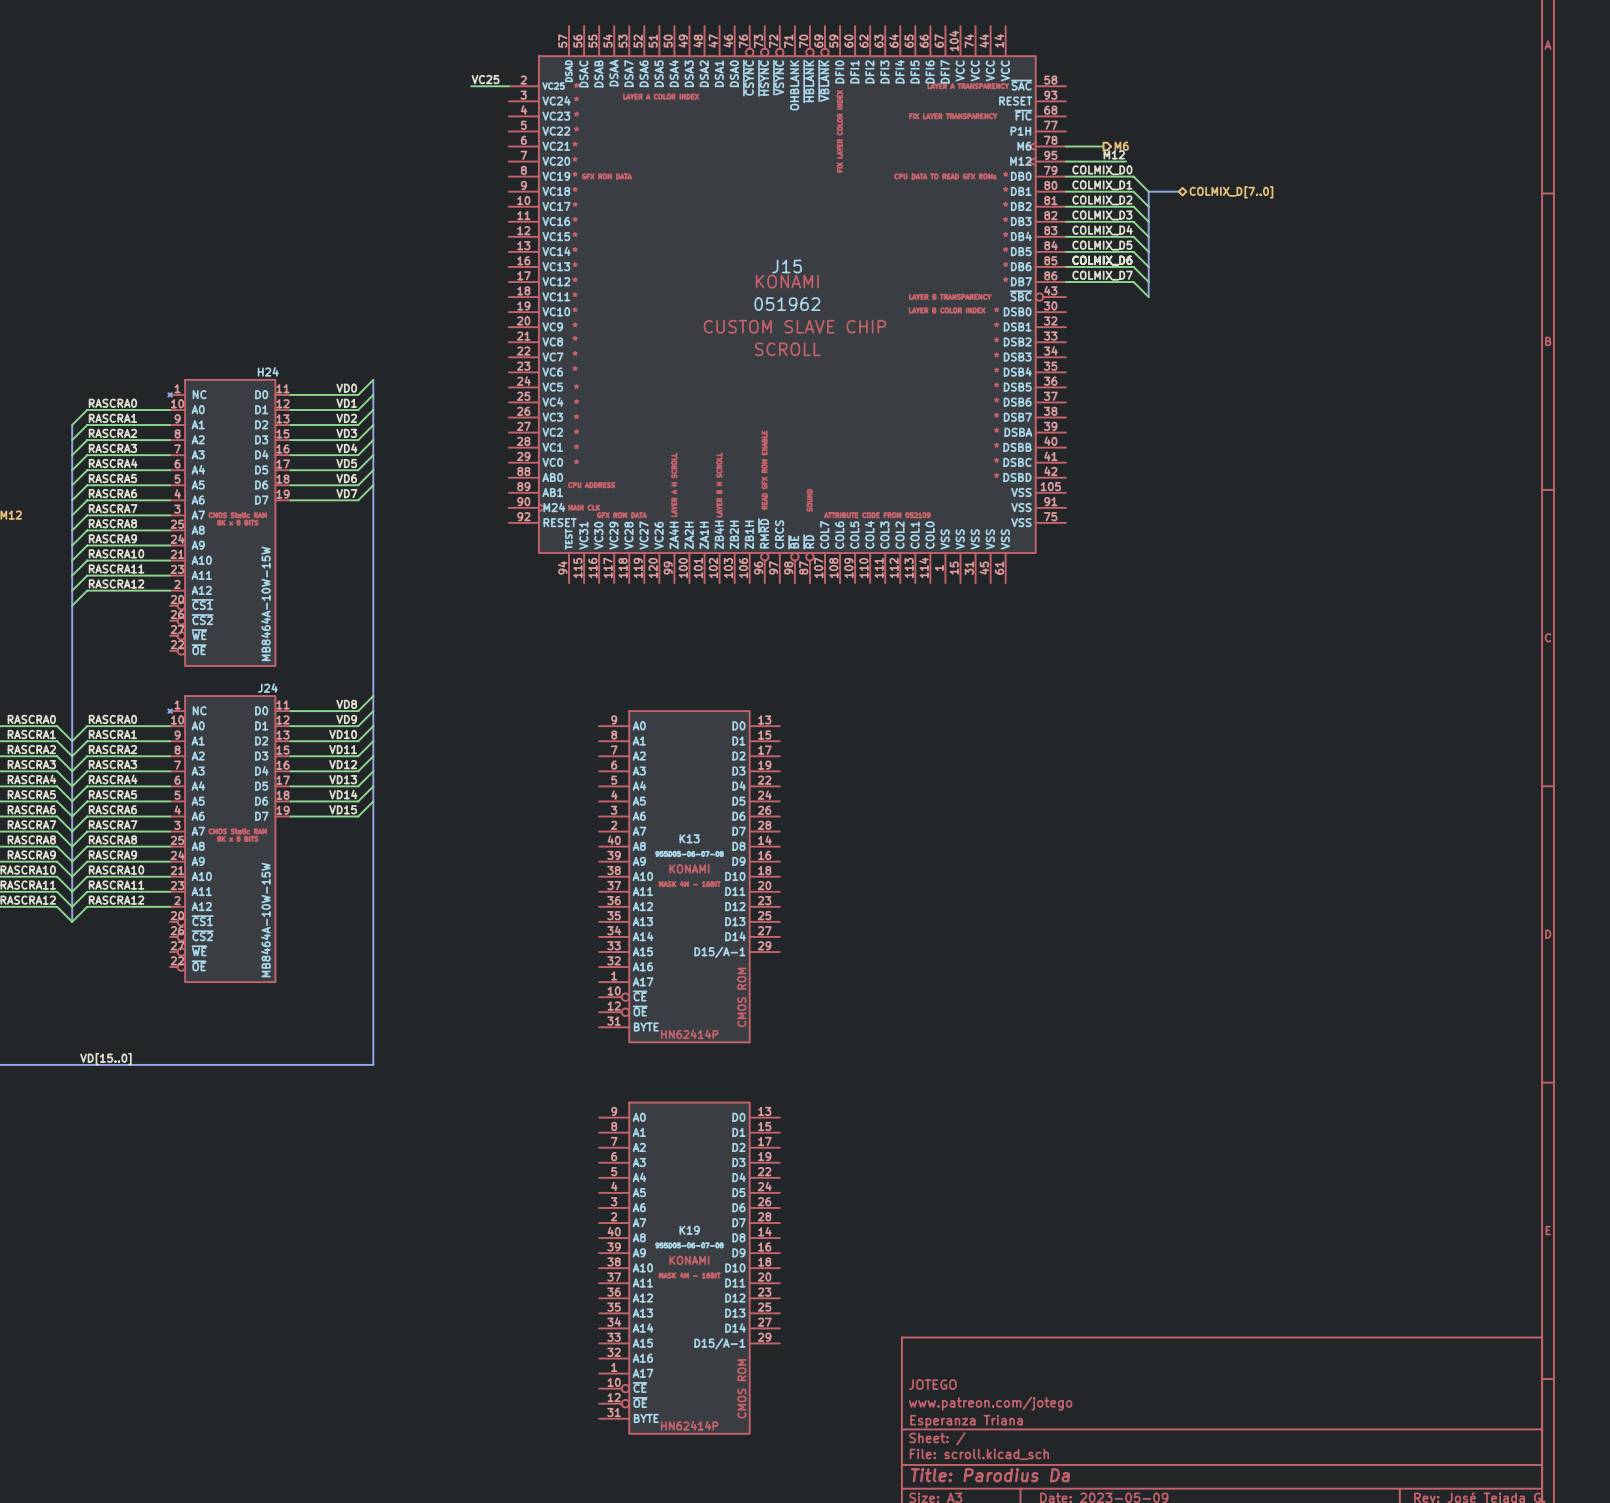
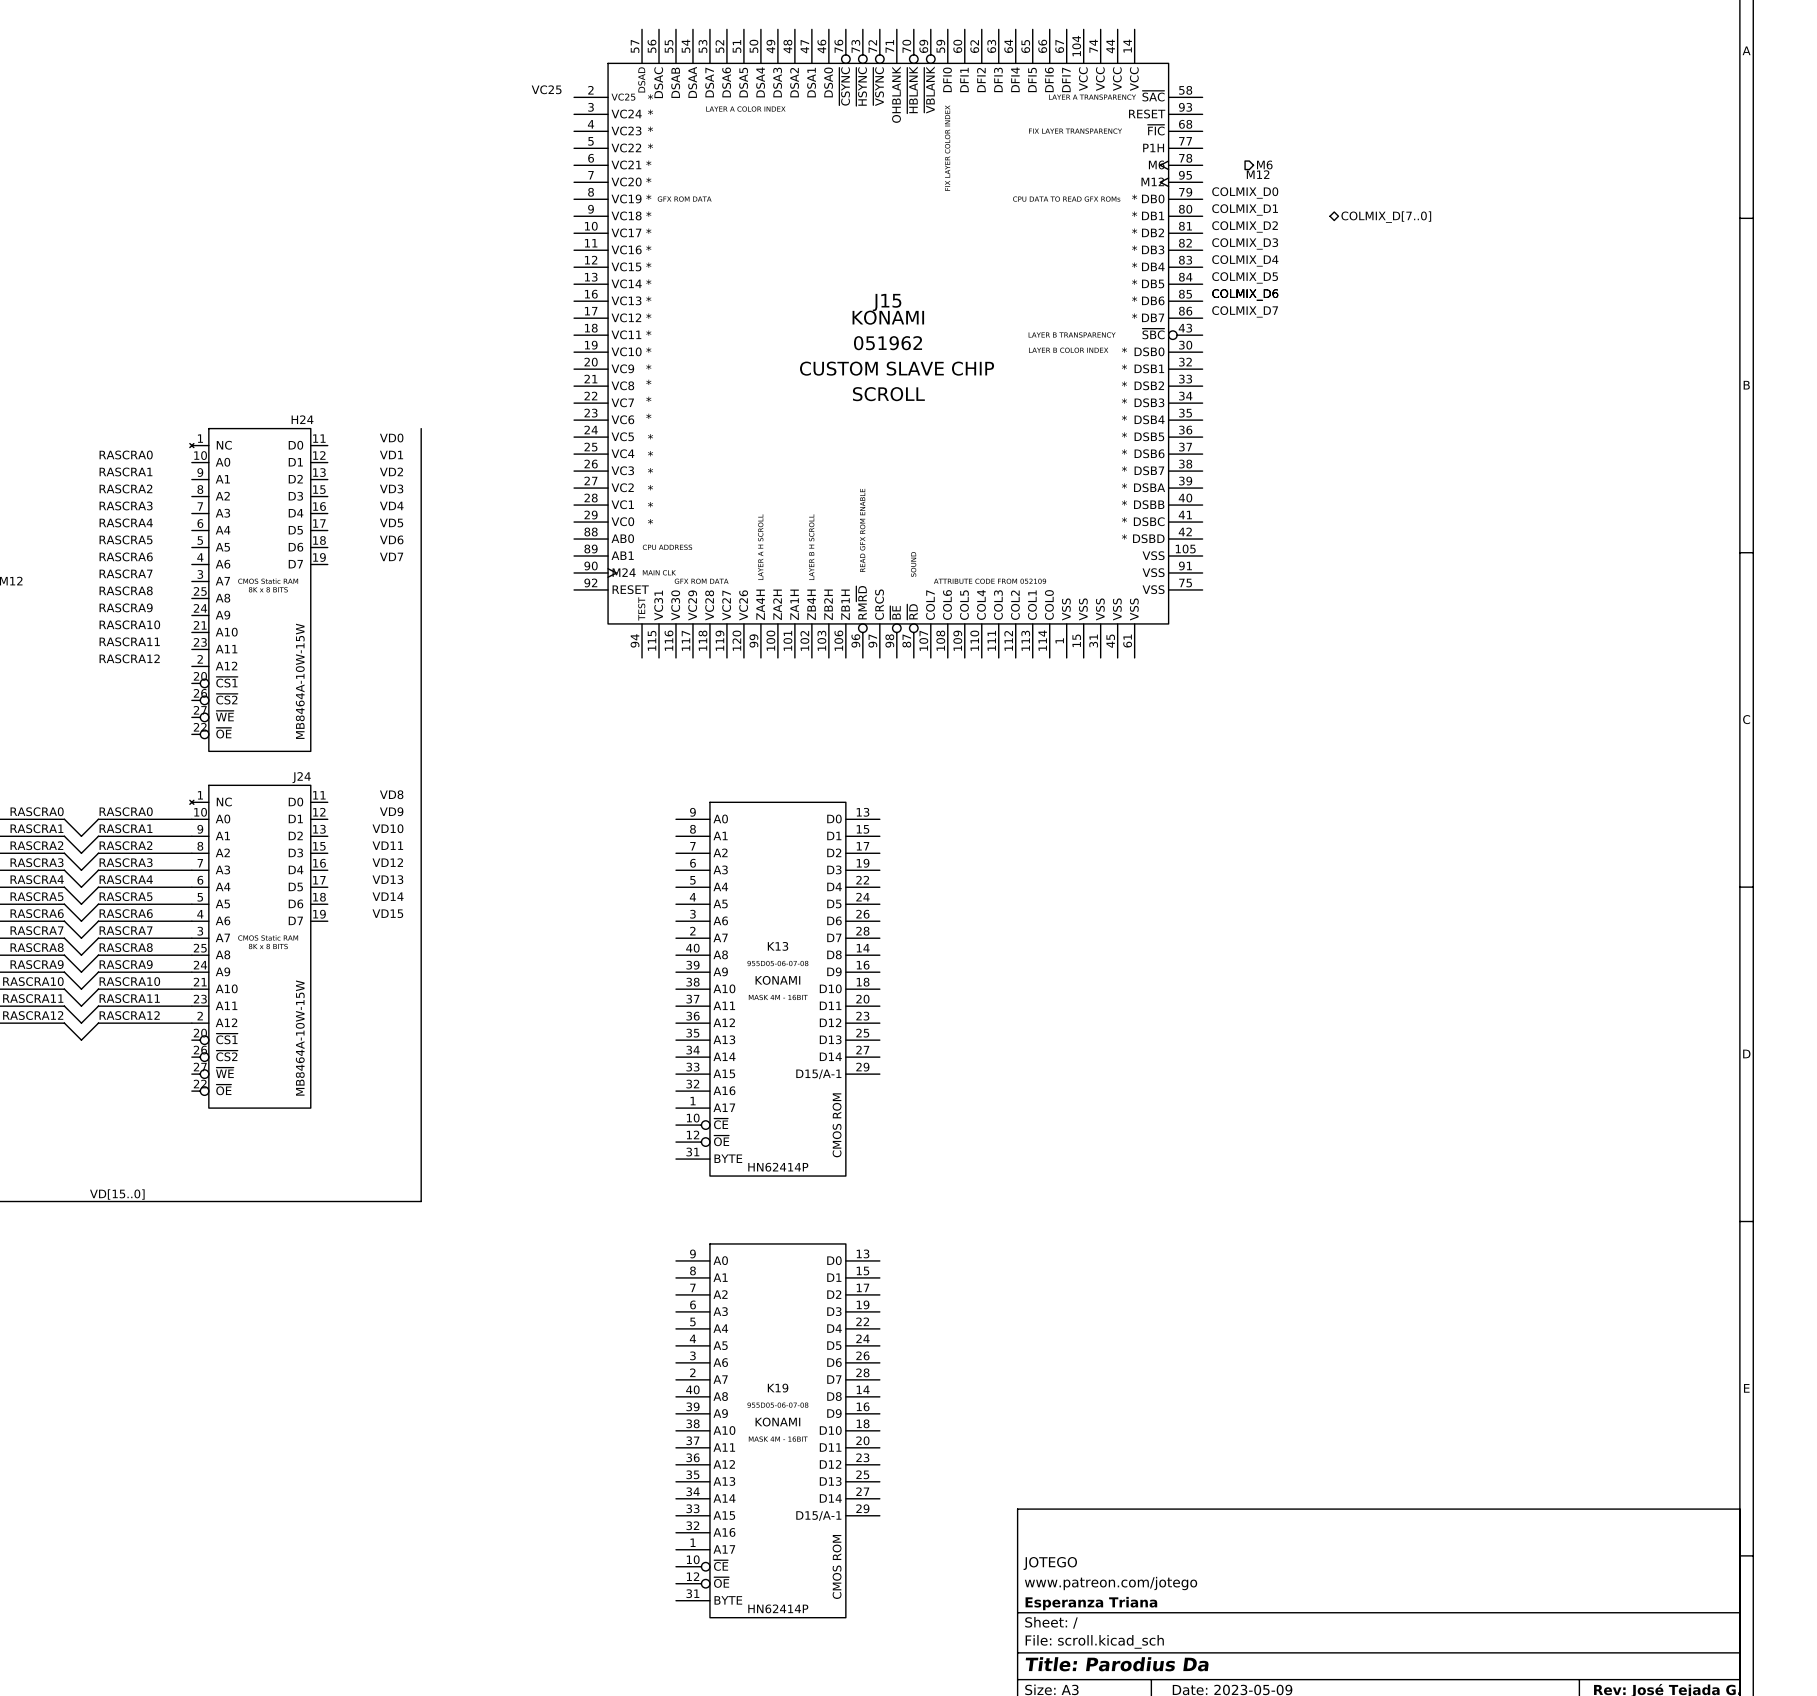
wire: (471, 86) (508, 86) -> none
wire: (1065, 146) (1103, 146) -> none
wire: (1065, 161) (1126, 161) -> none
wire: (1065, 176) (1133, 176) (1148, 191) -> none
wire: (1065, 191) (1133, 191) (1148, 206) -> none
bus: (1178, 191) (1148, 191) (1148, 297) -> none
wire: (1065, 206) (1133, 206) (1148, 221) -> none
wire: (1065, 221) (1133, 221) (1148, 236) -> none
wire: (1065, 236) (1133, 236) (1148, 251) -> none
wire: (1065, 251) (1133, 251) (1148, 266) -> none
wire: (1065, 266) (1133, 266) (1148, 282) -> none
wire: (1065, 282) (1133, 282) (1148, 297) -> none
wire: (373, 379) (358, 394) (290, 394) -> none
wire: (373, 394) (358, 409) (290, 409) -> none
wire: (170, 409) (87, 409) (72, 425) -> none
wire: (373, 409) (358, 425) (290, 425) -> none
bus: (72, 425) (72, 921) -> none
wire: (170, 425) (87, 425) (72, 440) -> none
wire: (373, 425) (358, 440) (290, 440) -> none
wire: (170, 440) (87, 440) (72, 455) -> none
wire: (373, 440) (358, 455) (290, 455) -> none
wire: (170, 455) (87, 455) (72, 470) -> none
wire: (373, 455) (358, 470) (290, 470) -> none
wire: (170, 470) (87, 470) (72, 485) -> none
wire: (373, 470) (358, 485) (290, 485) -> none
wire: (170, 485) (87, 485) (72, 500) -> none
wire: (373, 485) (358, 500) (290, 500) -> none
wire: (170, 500) (87, 500) (72, 515) -> none
wire: (170, 515) (87, 515) (72, 530) -> none
wire: (170, 530) (87, 530) (72, 545) -> none
wire: (170, 545) (87, 545) (72, 560) -> none
wire: (170, 560) (87, 560) (72, 575) -> none
wire: (170, 575) (87, 575) (72, 590) -> none
wire: (170, 590) (87, 590) (72, 605) -> none
wire: (373, 696) (358, 711) (290, 711) -> none
wire: (373, 711) (358, 726) (290, 726) -> none
wire: (373, 726) (358, 741) (290, 741) -> none
wire: (373, 741) (358, 756) (290, 756) -> none
wire: (373, 756) (358, 771) (290, 771) -> none
wire: (373, 771) (358, 786) (290, 786) -> none
wire: (373, 786) (358, 801) (290, 801) -> none
wire: (373, 801) (358, 816) (290, 816) -> none

